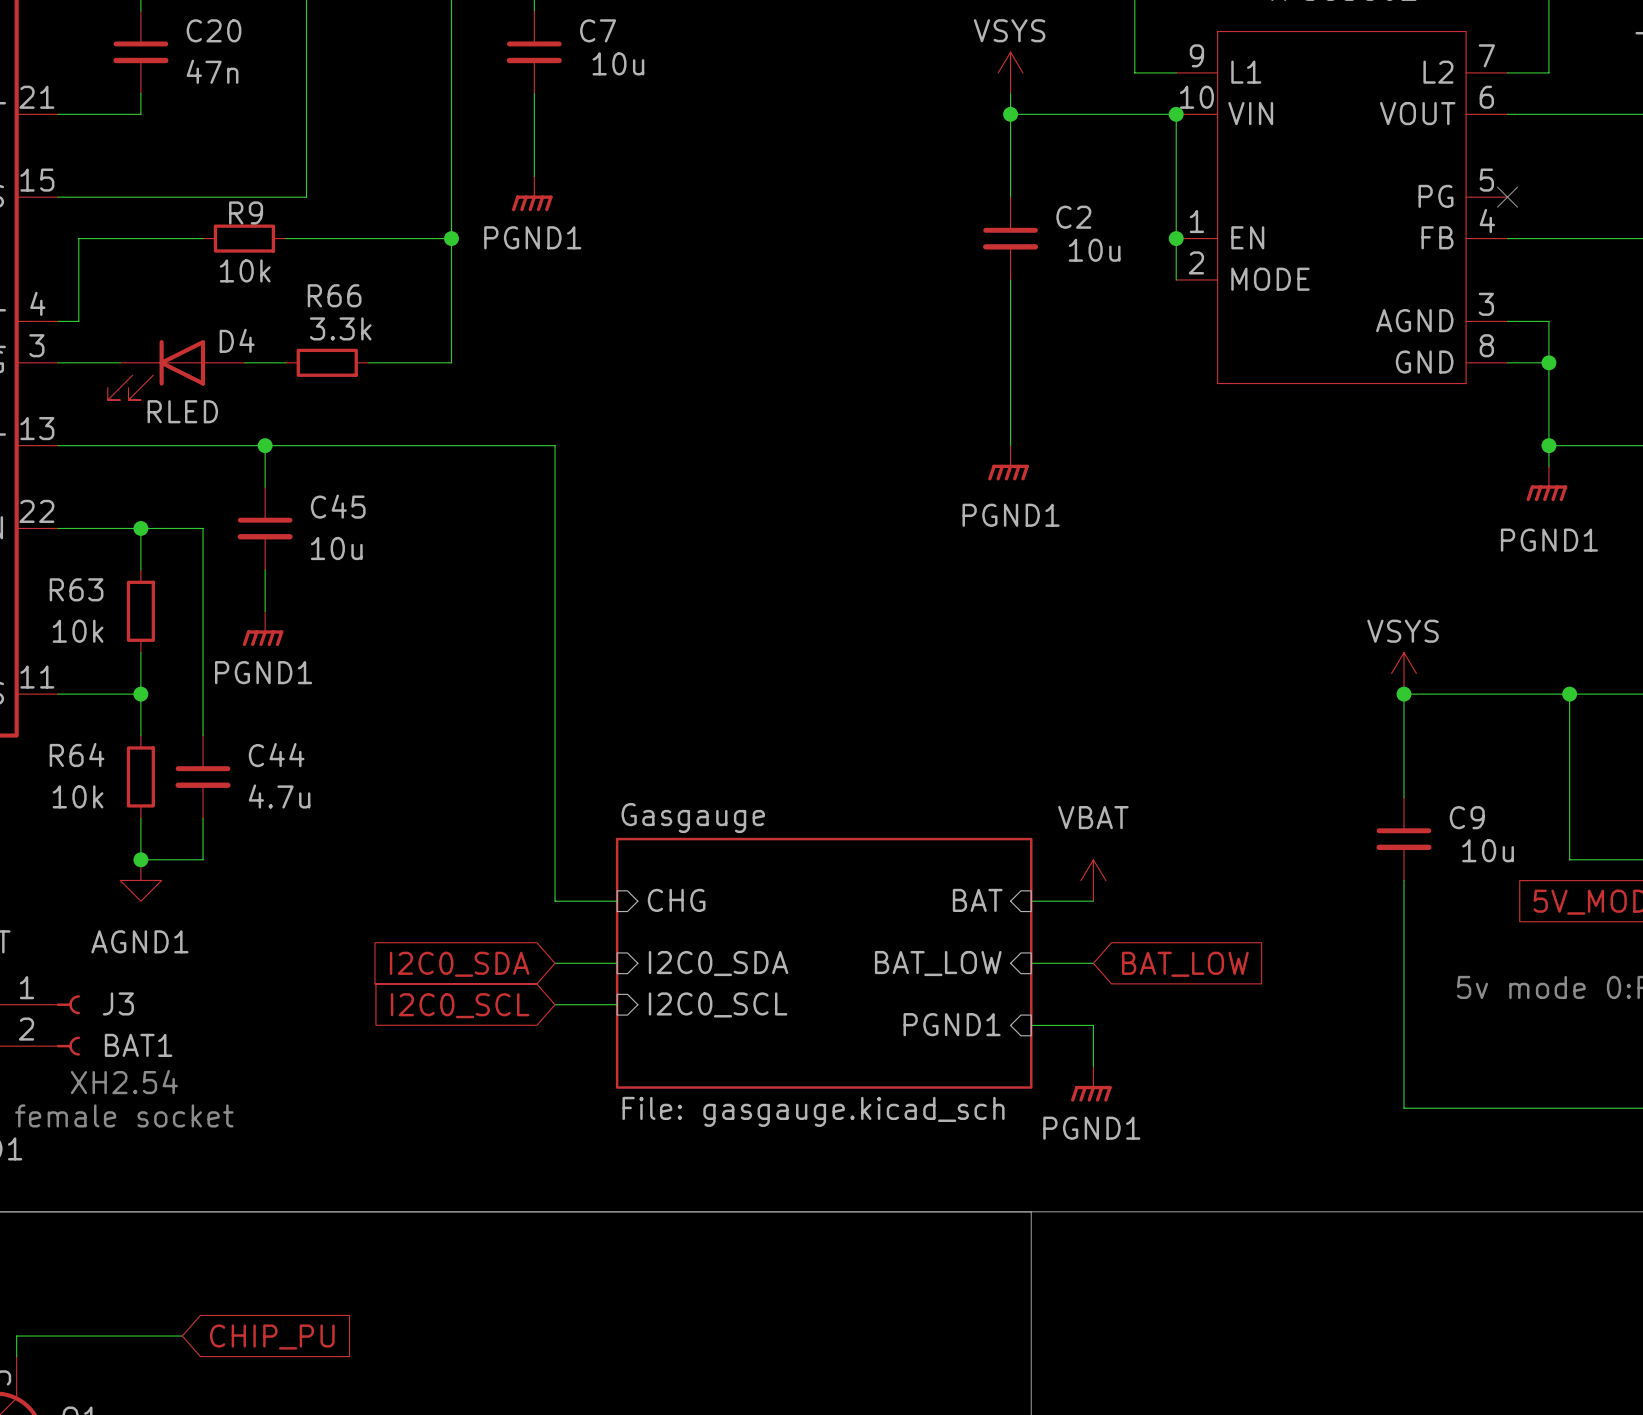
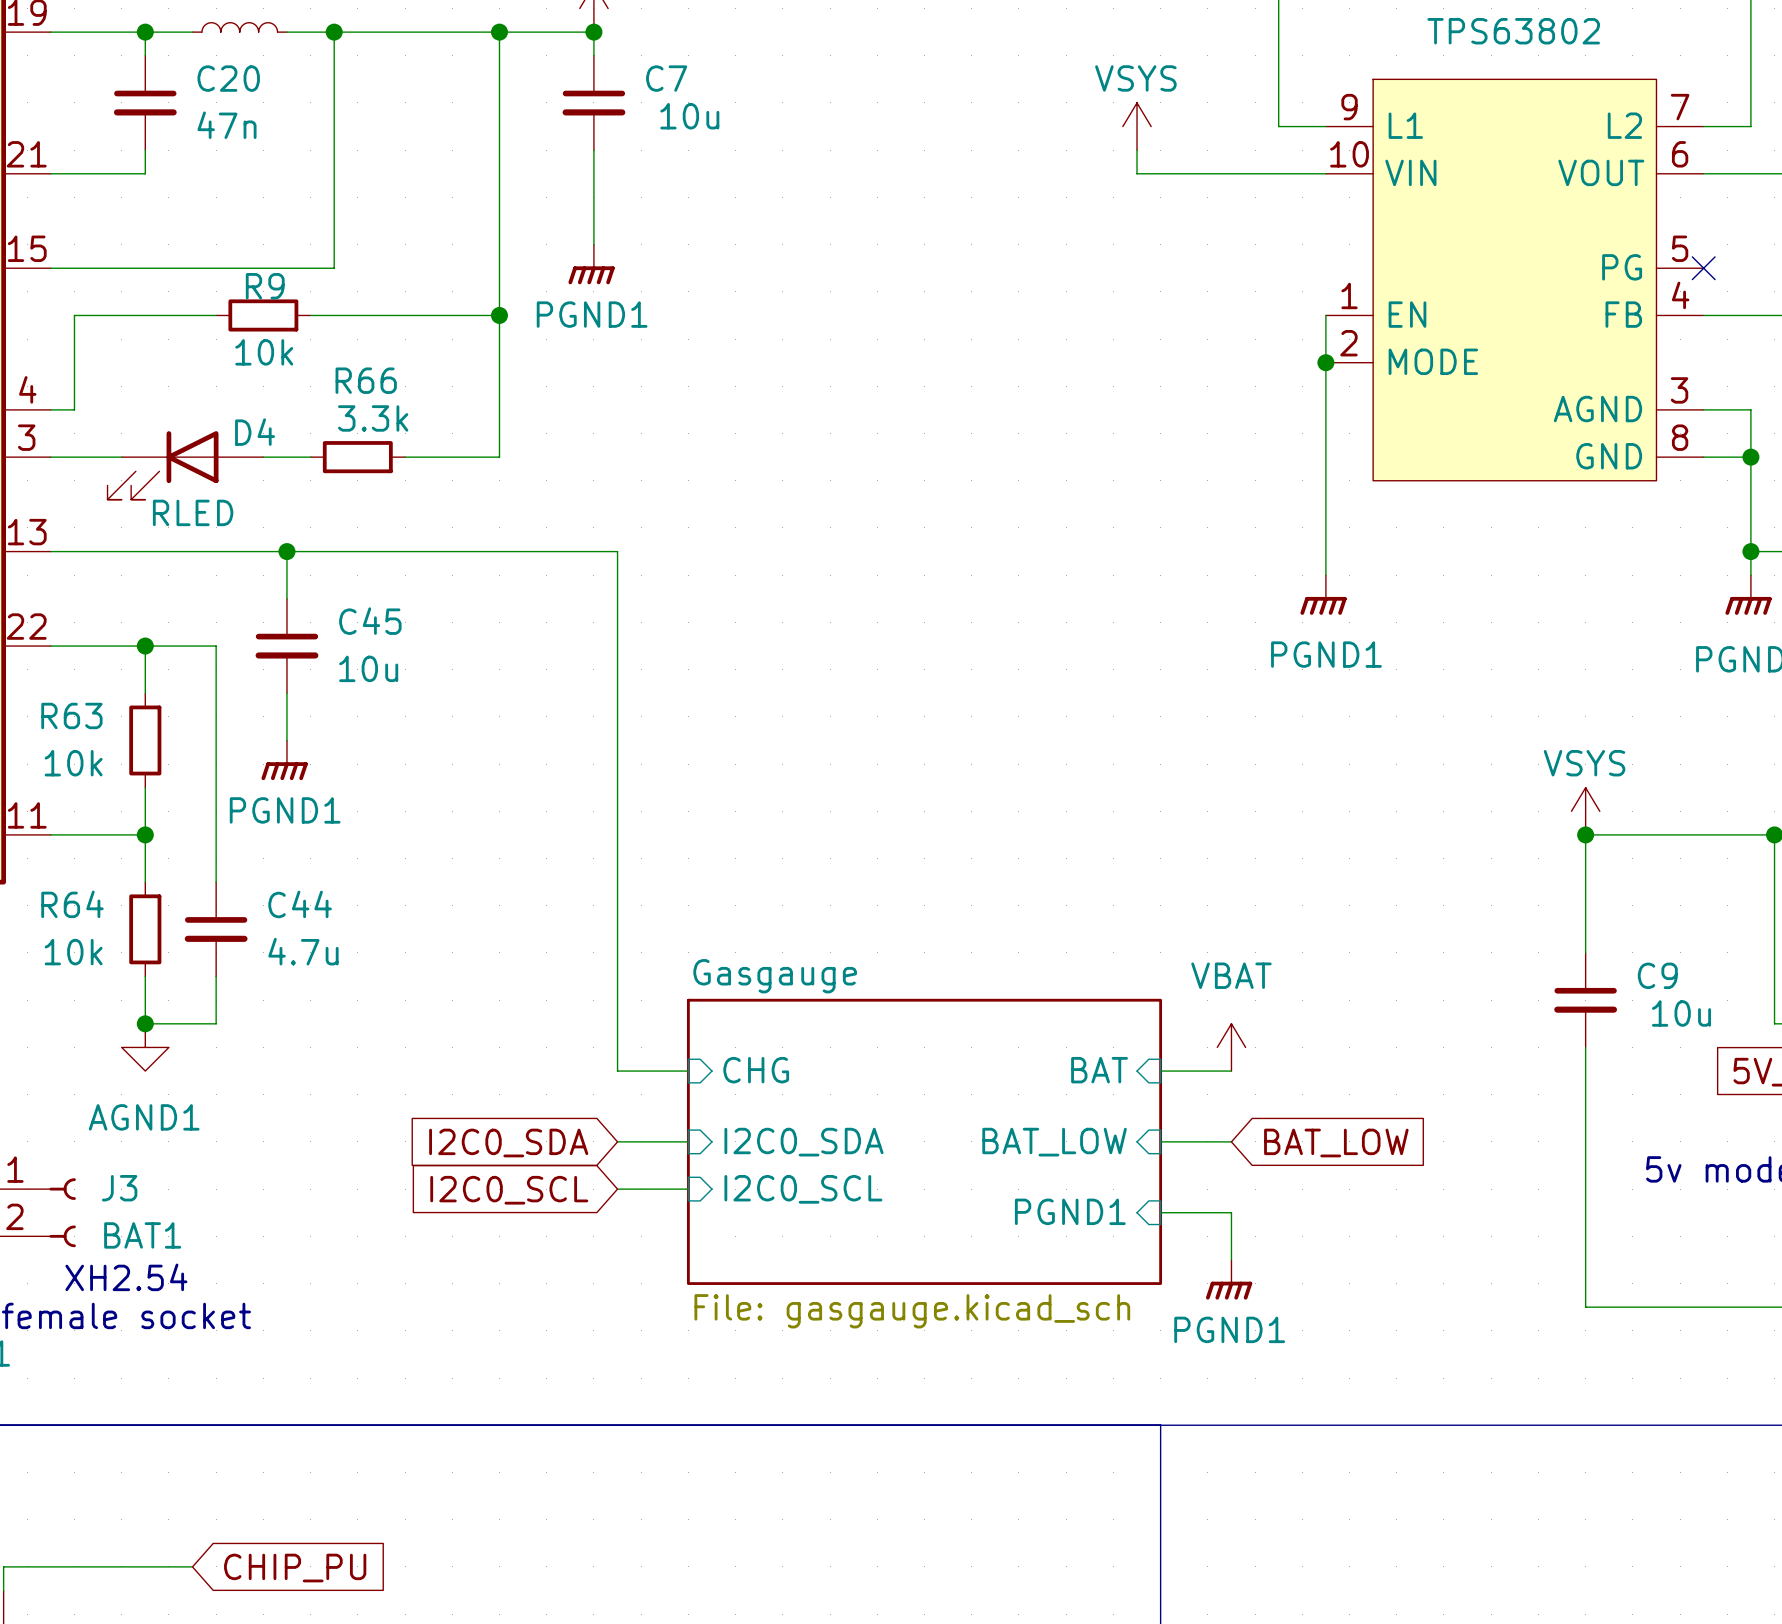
wire: (1010, 114) (1010, 197) -> none
junction: (1010, 114) -> none
wire: (1176, 114) (1176, 238) -> none
junction: (1176, 114) -> none
C2: 10u (1010, 238) -> none
junction position: (1176, 238) -> (1325, 362)
wire: (1010, 279) (1010, 445) -> none
wire: none -> (1325, 362) (1325, 575)
power symbol position: PGND1 (1008, 463) -> PGND1 (1323, 595)

